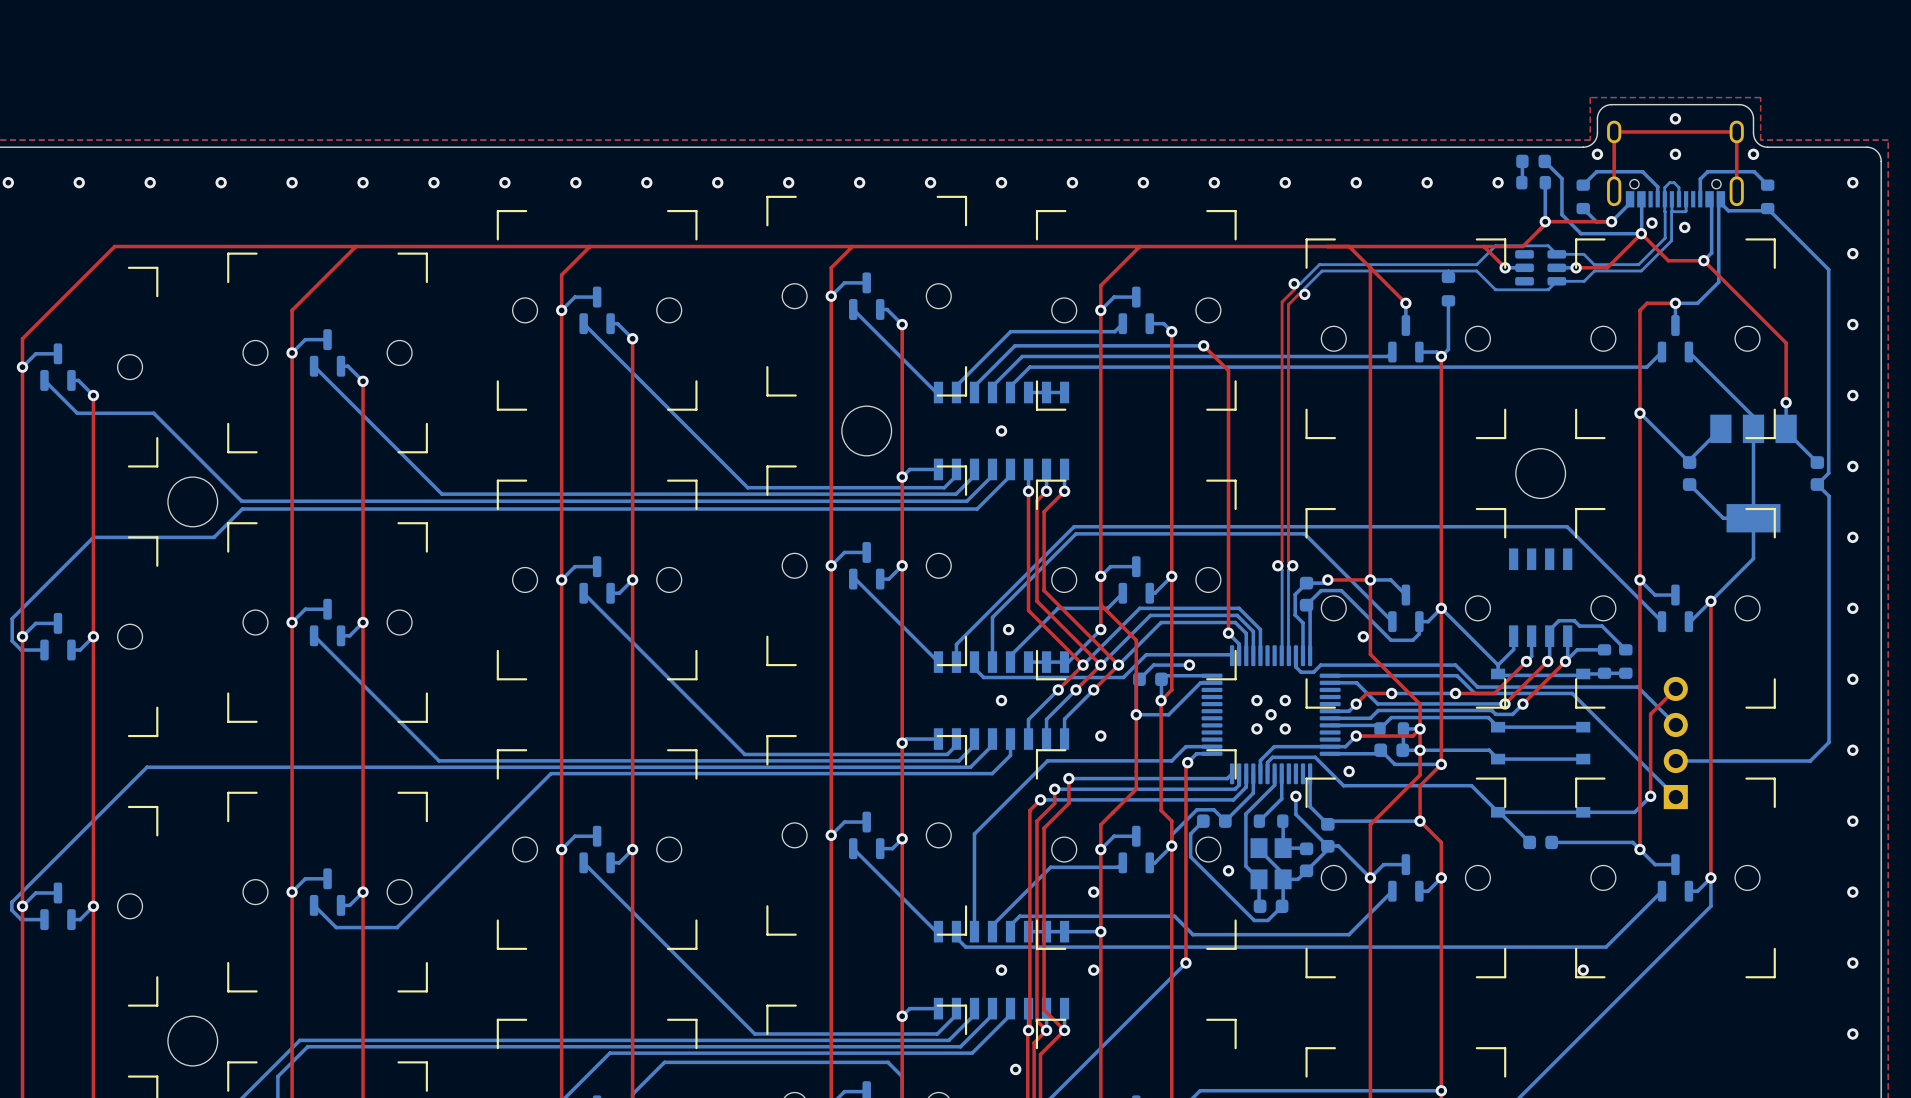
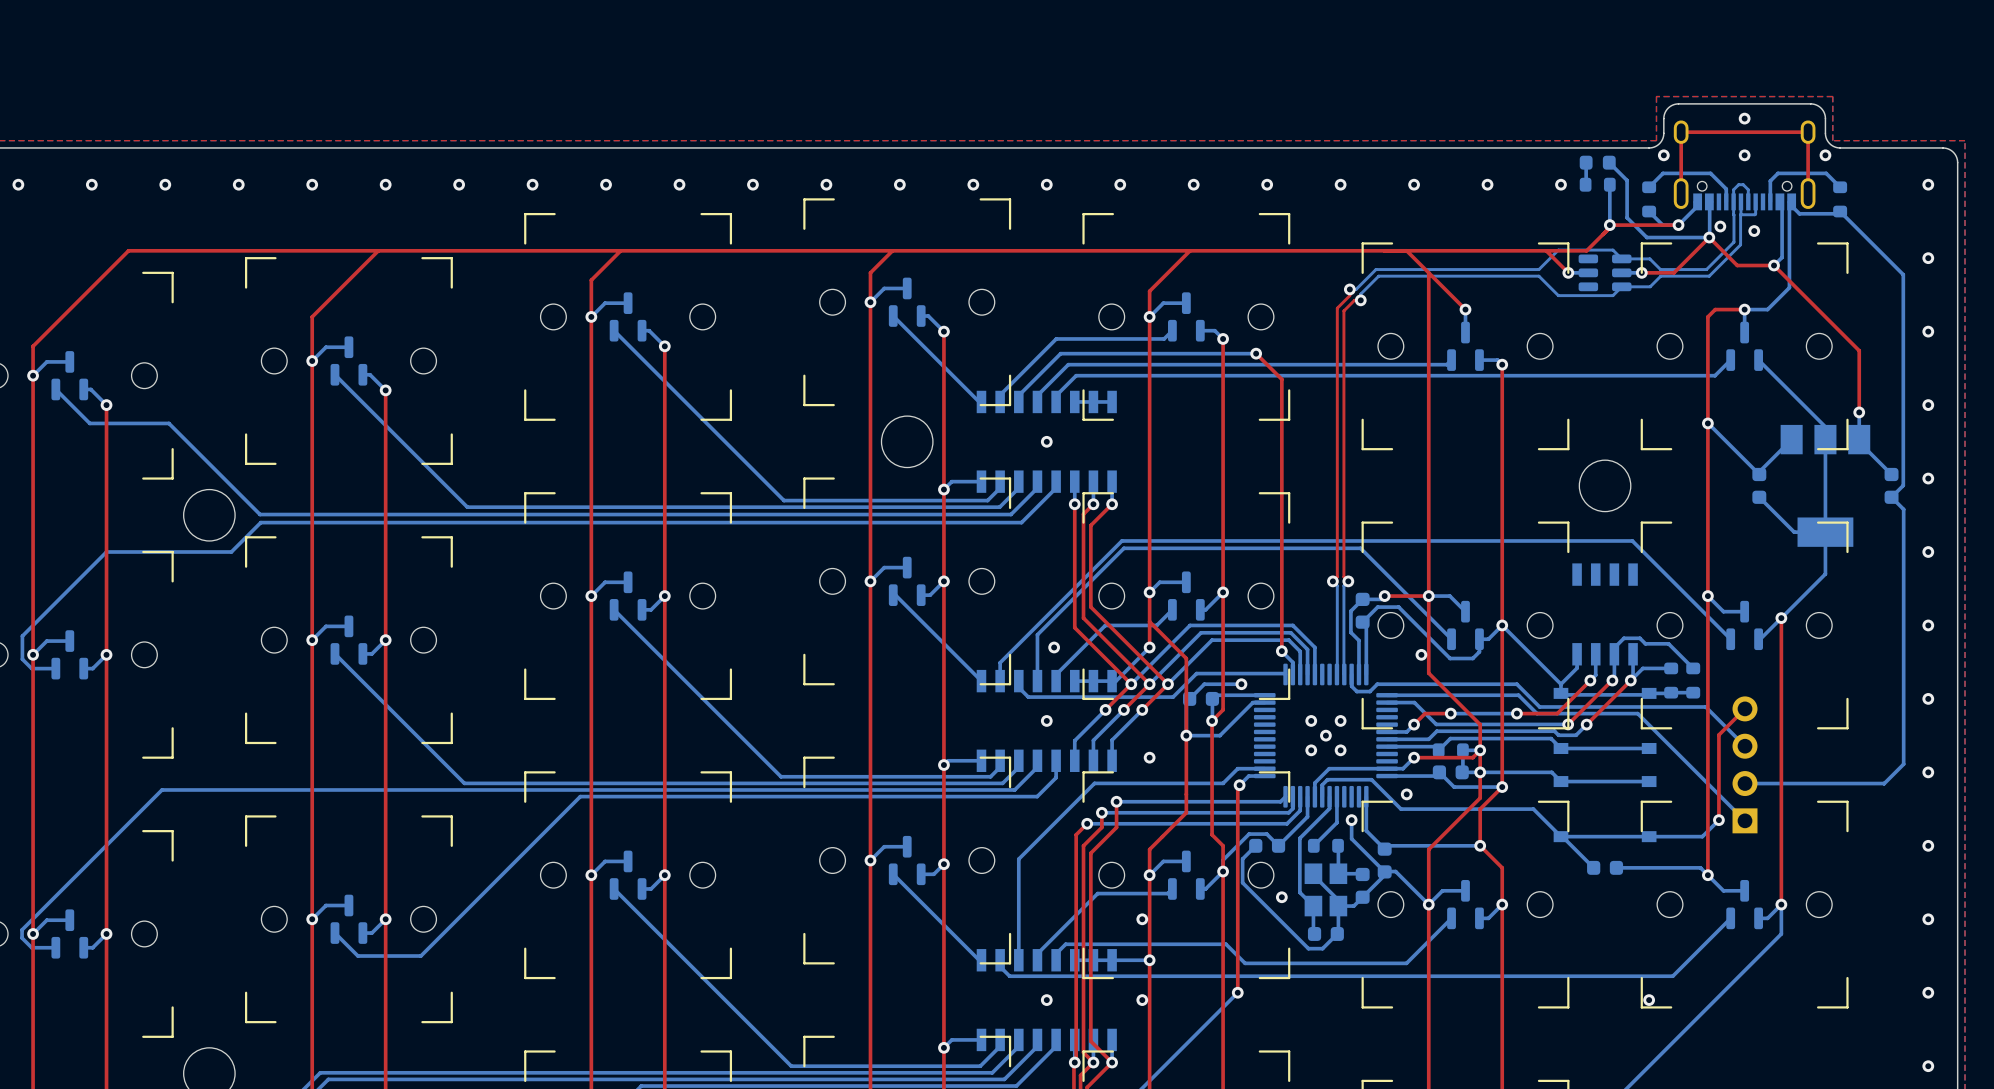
part: (1448, 289) -> none
bottom track: (1448, 300) (1448, 349) (1441, 356) -> none

